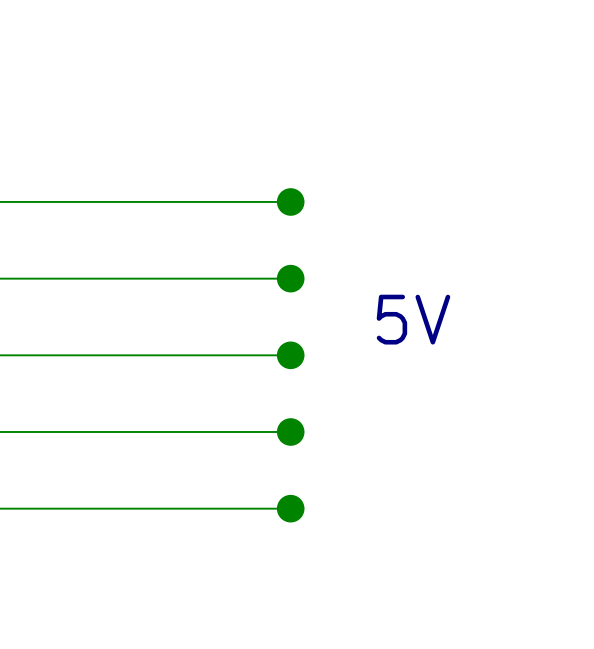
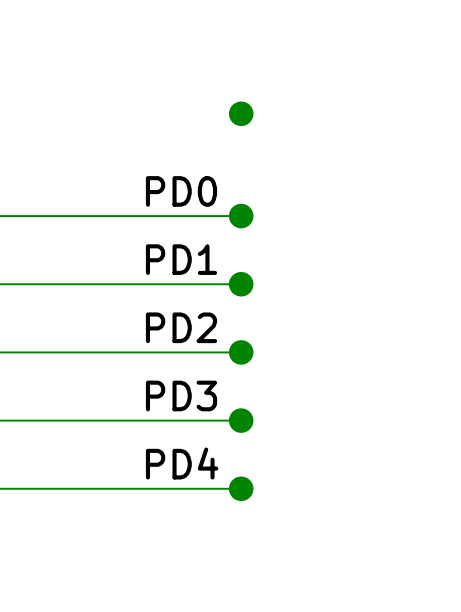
junction: none -> (241, 113)
label: none -> PD0 (181, 191)
label: none -> PD1 (181, 259)
text: 5V (413, 319) -> none
label: none -> PD2 (181, 327)
label: none -> PD3 (181, 395)
label: none -> PD4 (182, 463)

